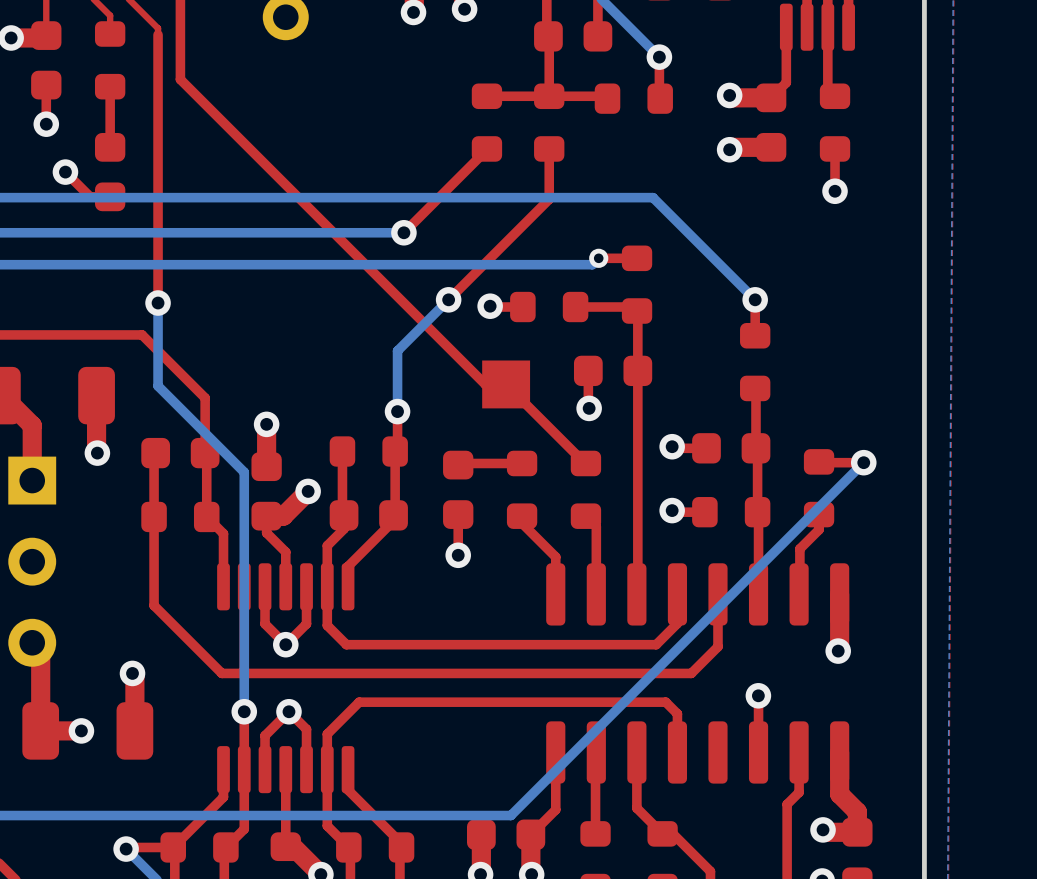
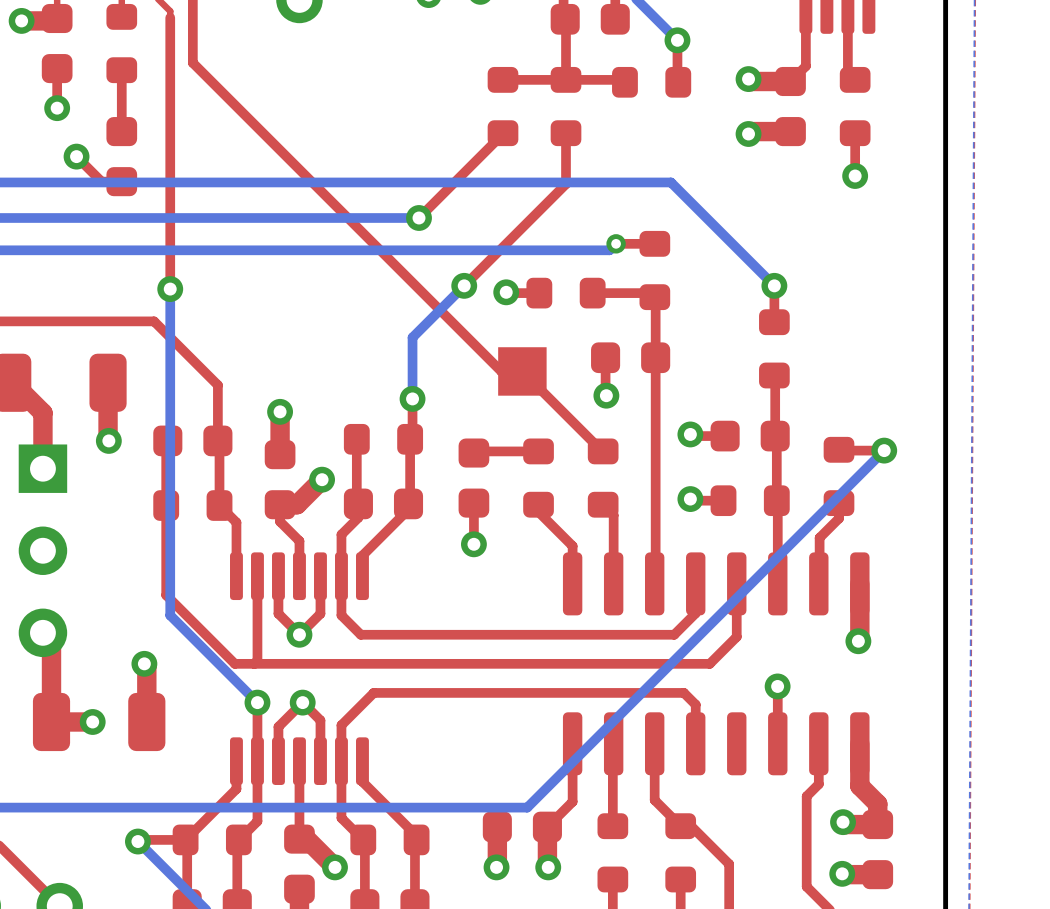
bottom track: (158, 386) (244, 472) (244, 711) -> (170, 373) (170, 615) (257, 702)

